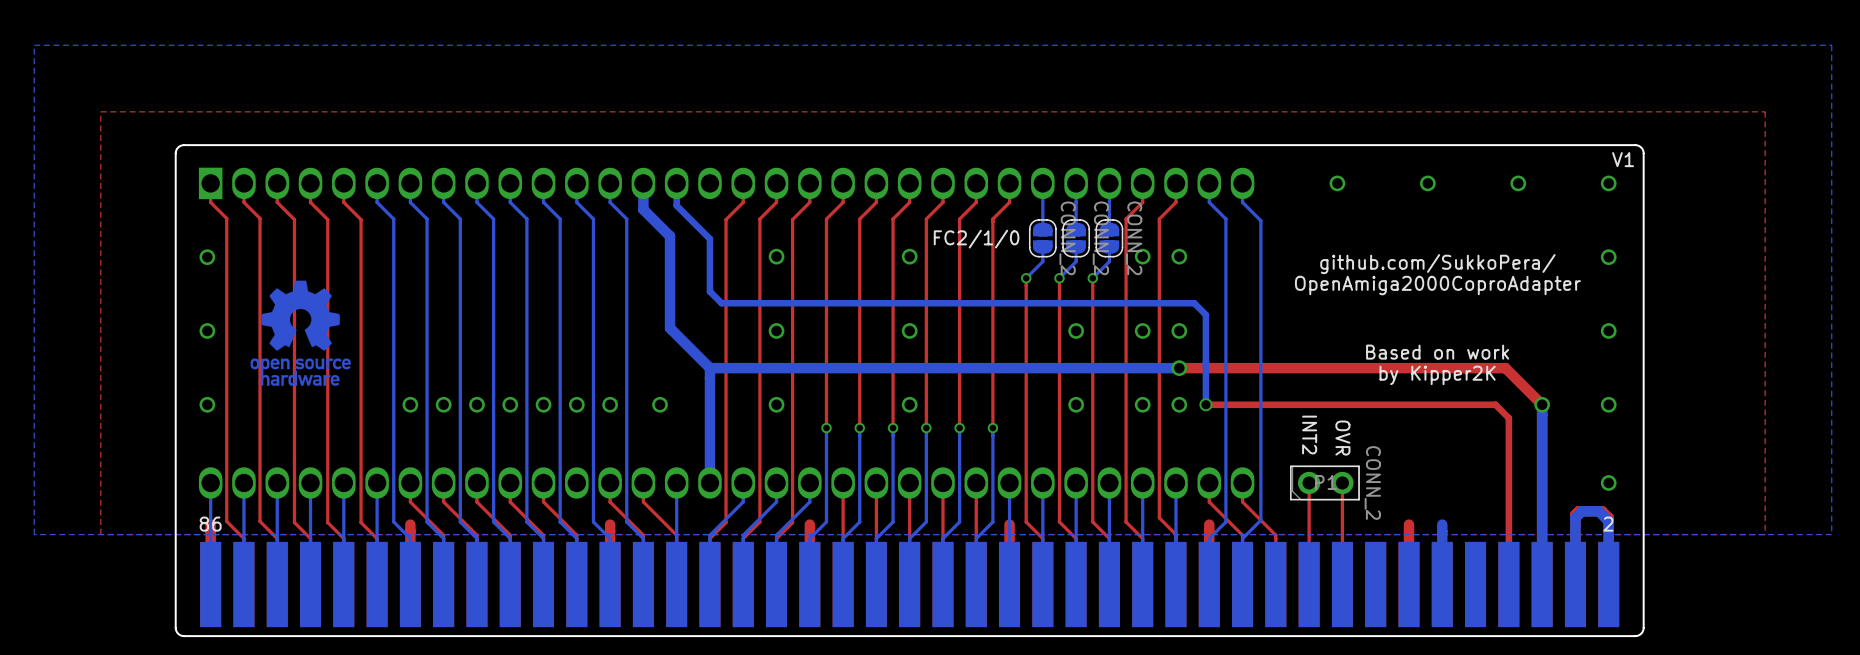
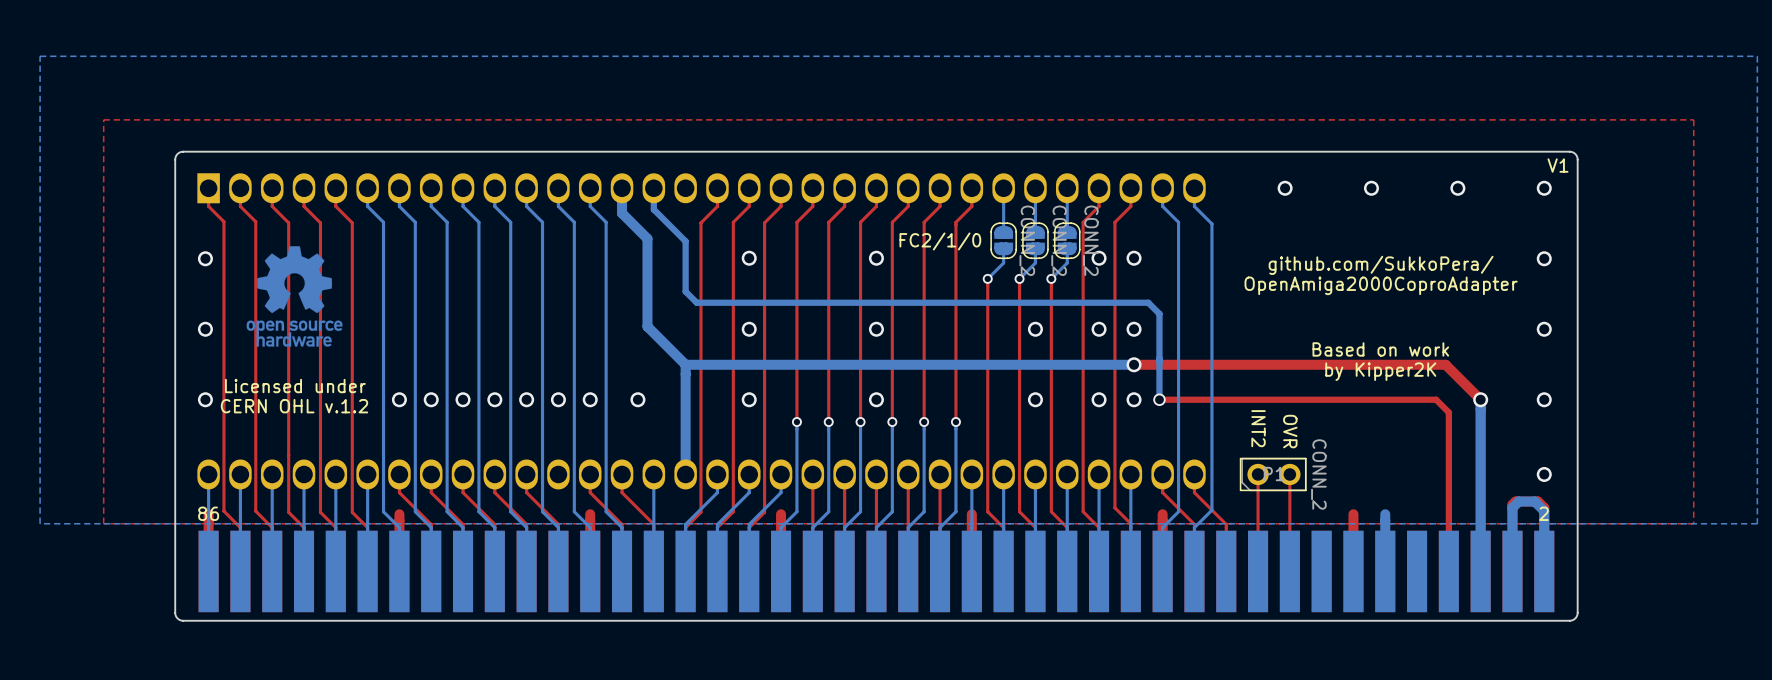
drawing position: (300, 333) -> (294, 296)
text: none -> Licensed under (295, 386)
text: none -> CERN OHL v.1.2 (294, 406)

